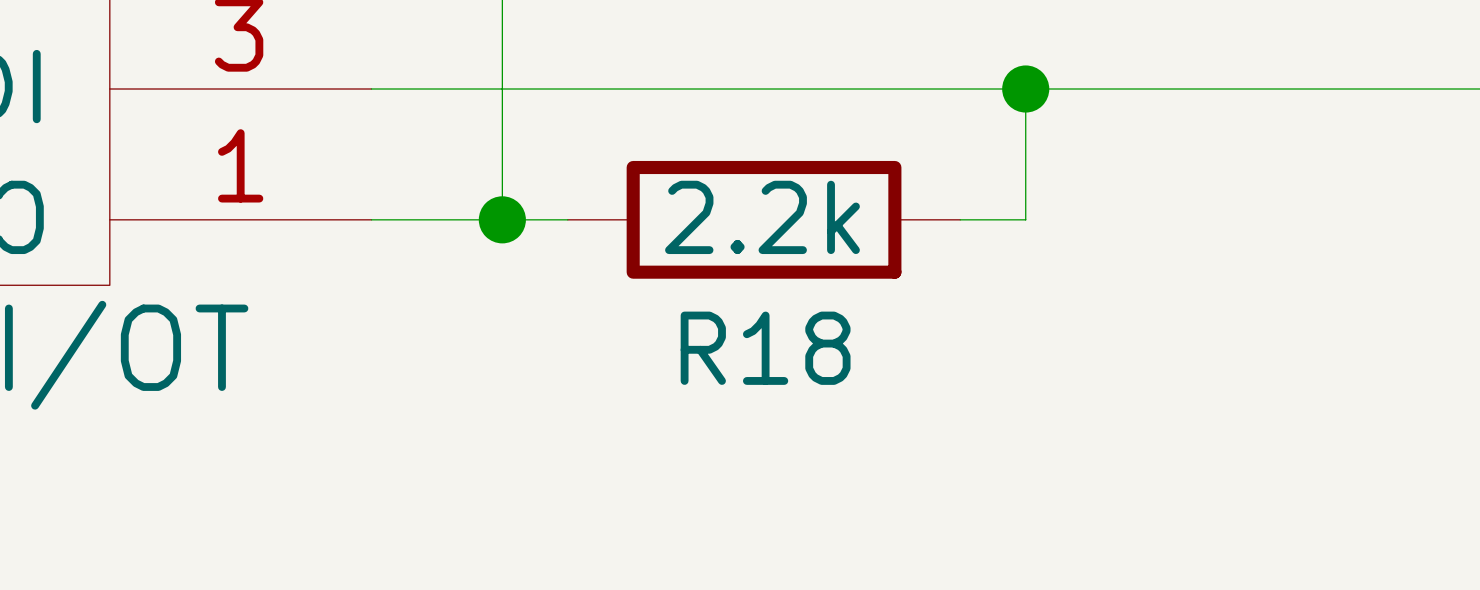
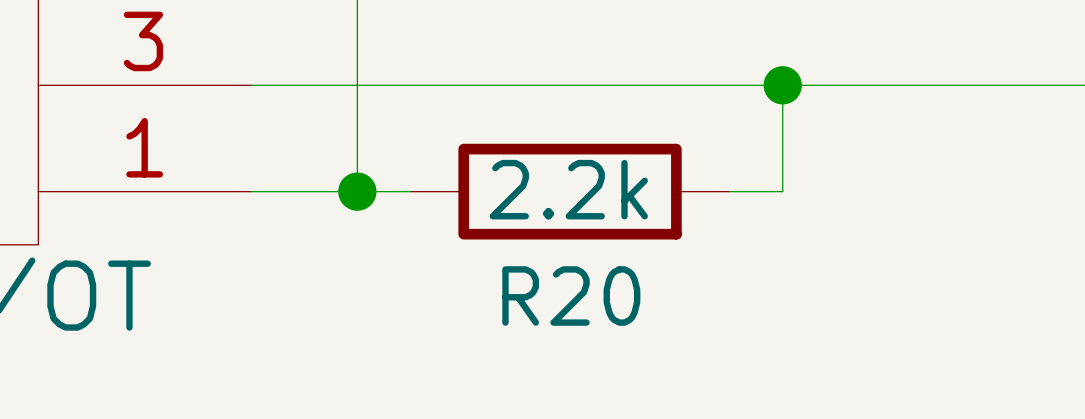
R18 name: R18 (765, 348) -> R20 (571, 296)

